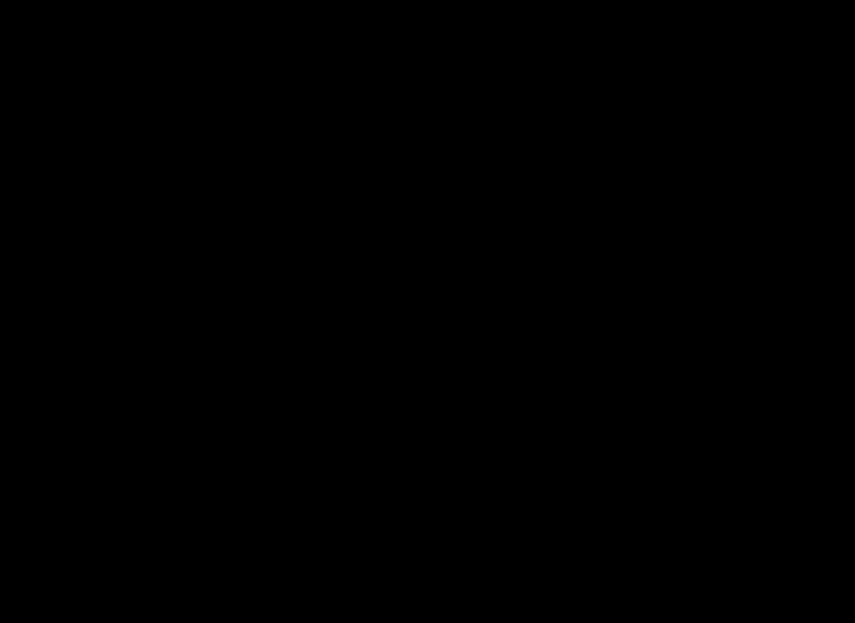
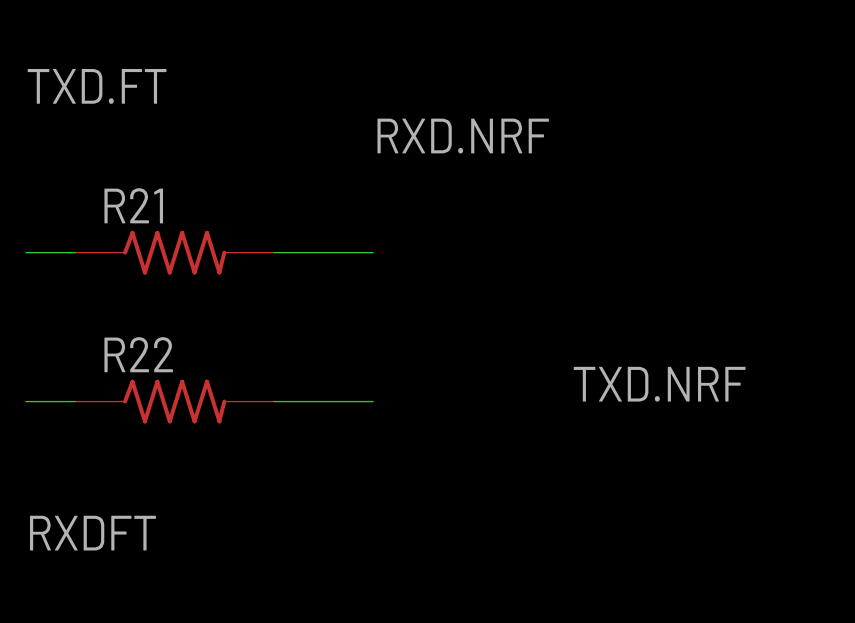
label: none -> TXD.FT (97, 86)
label: none -> RXD.NRF (463, 136)
wire: none -> (25, 252) (75, 252)
R21: none -> (174, 252)
wire: none -> (273, 252) (373, 252)
label: none -> TXD.NRF (659, 384)
wire: none -> (25, 401) (75, 401)
R22: none -> (174, 401)
wire: none -> (273, 401) (373, 401)
label: none -> RXDFT (92, 533)

